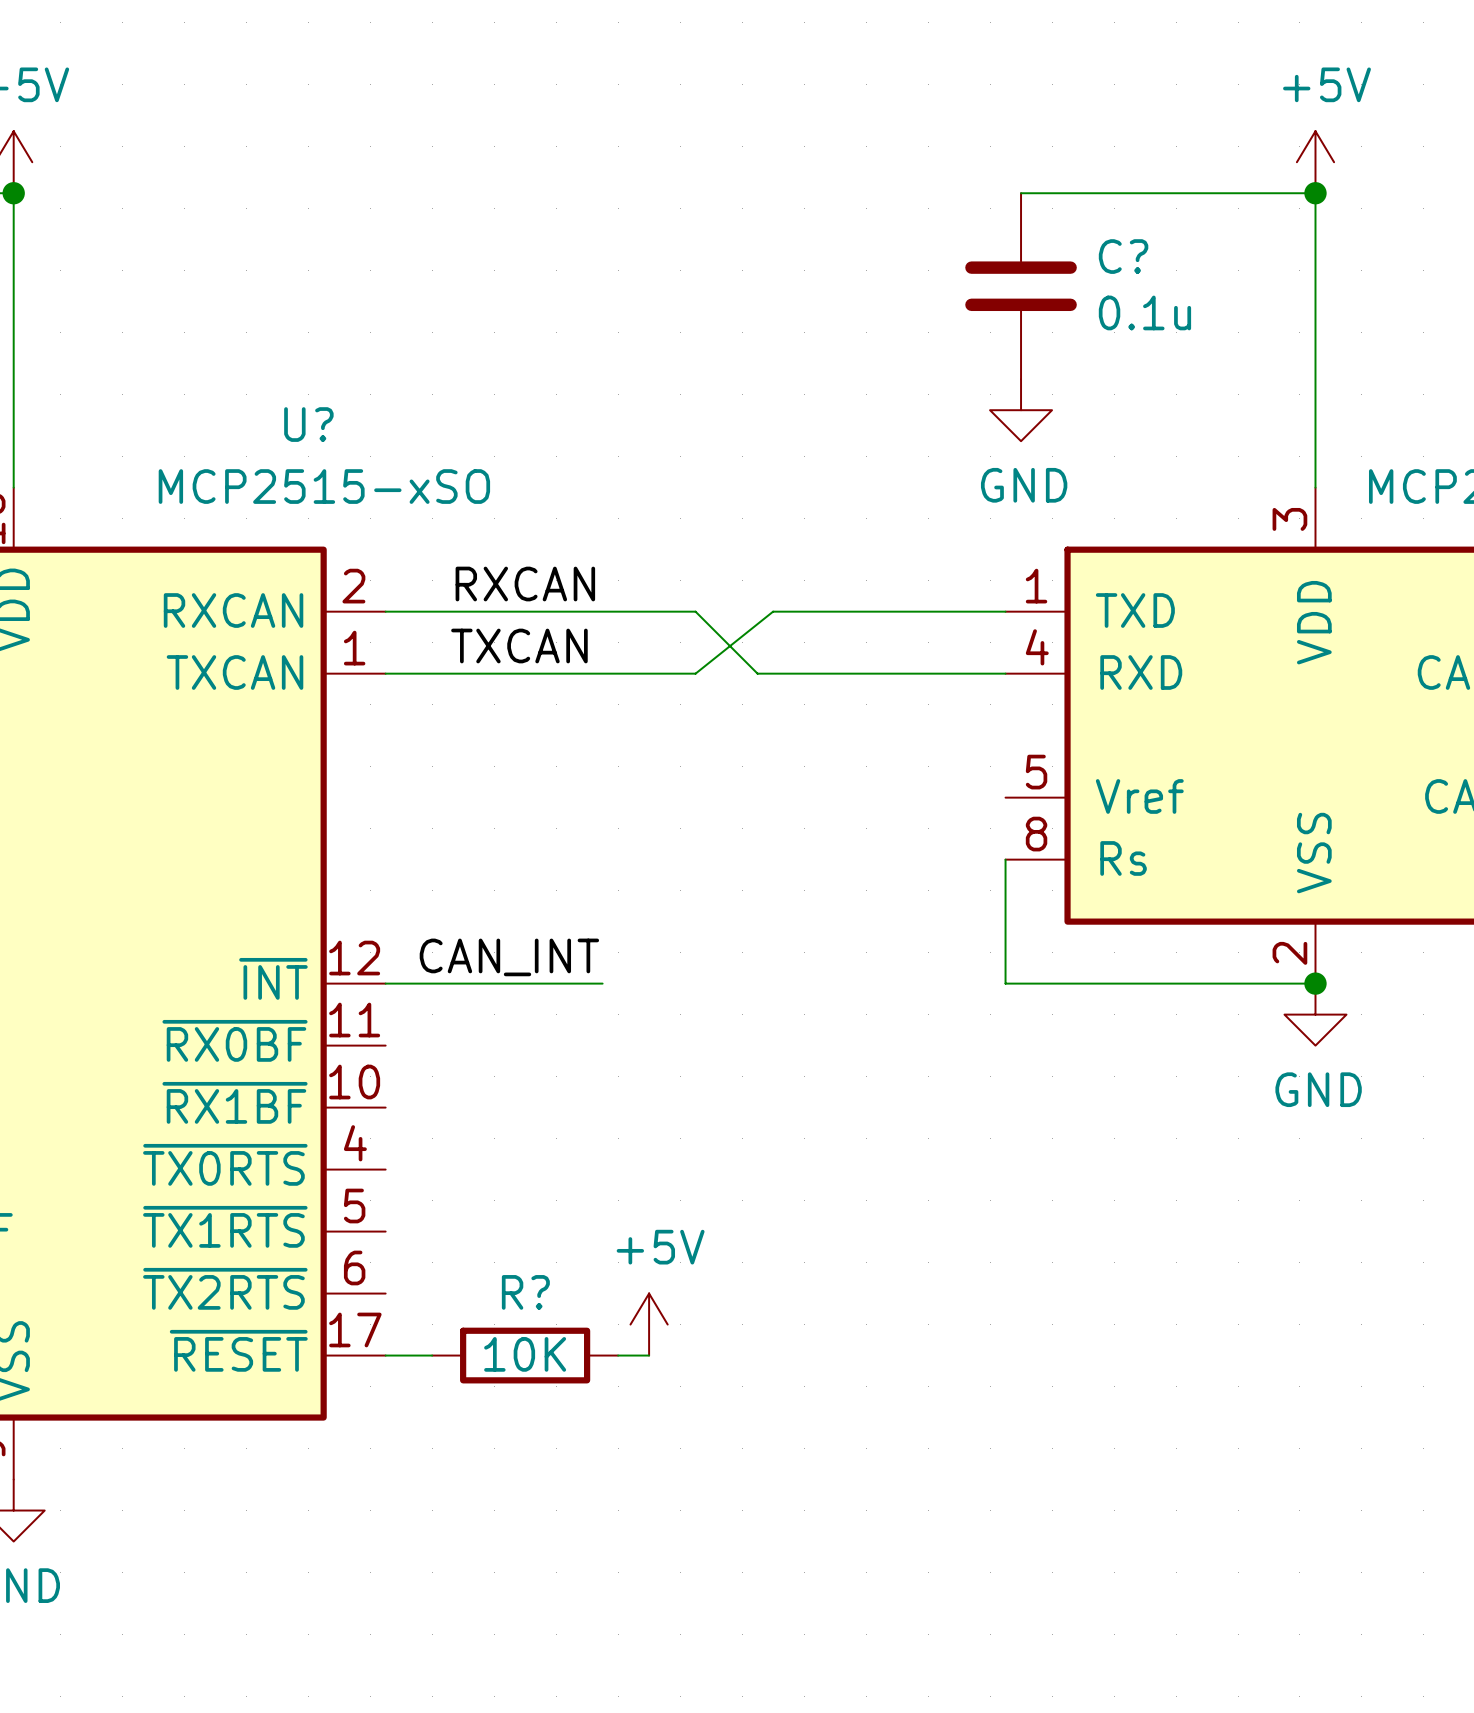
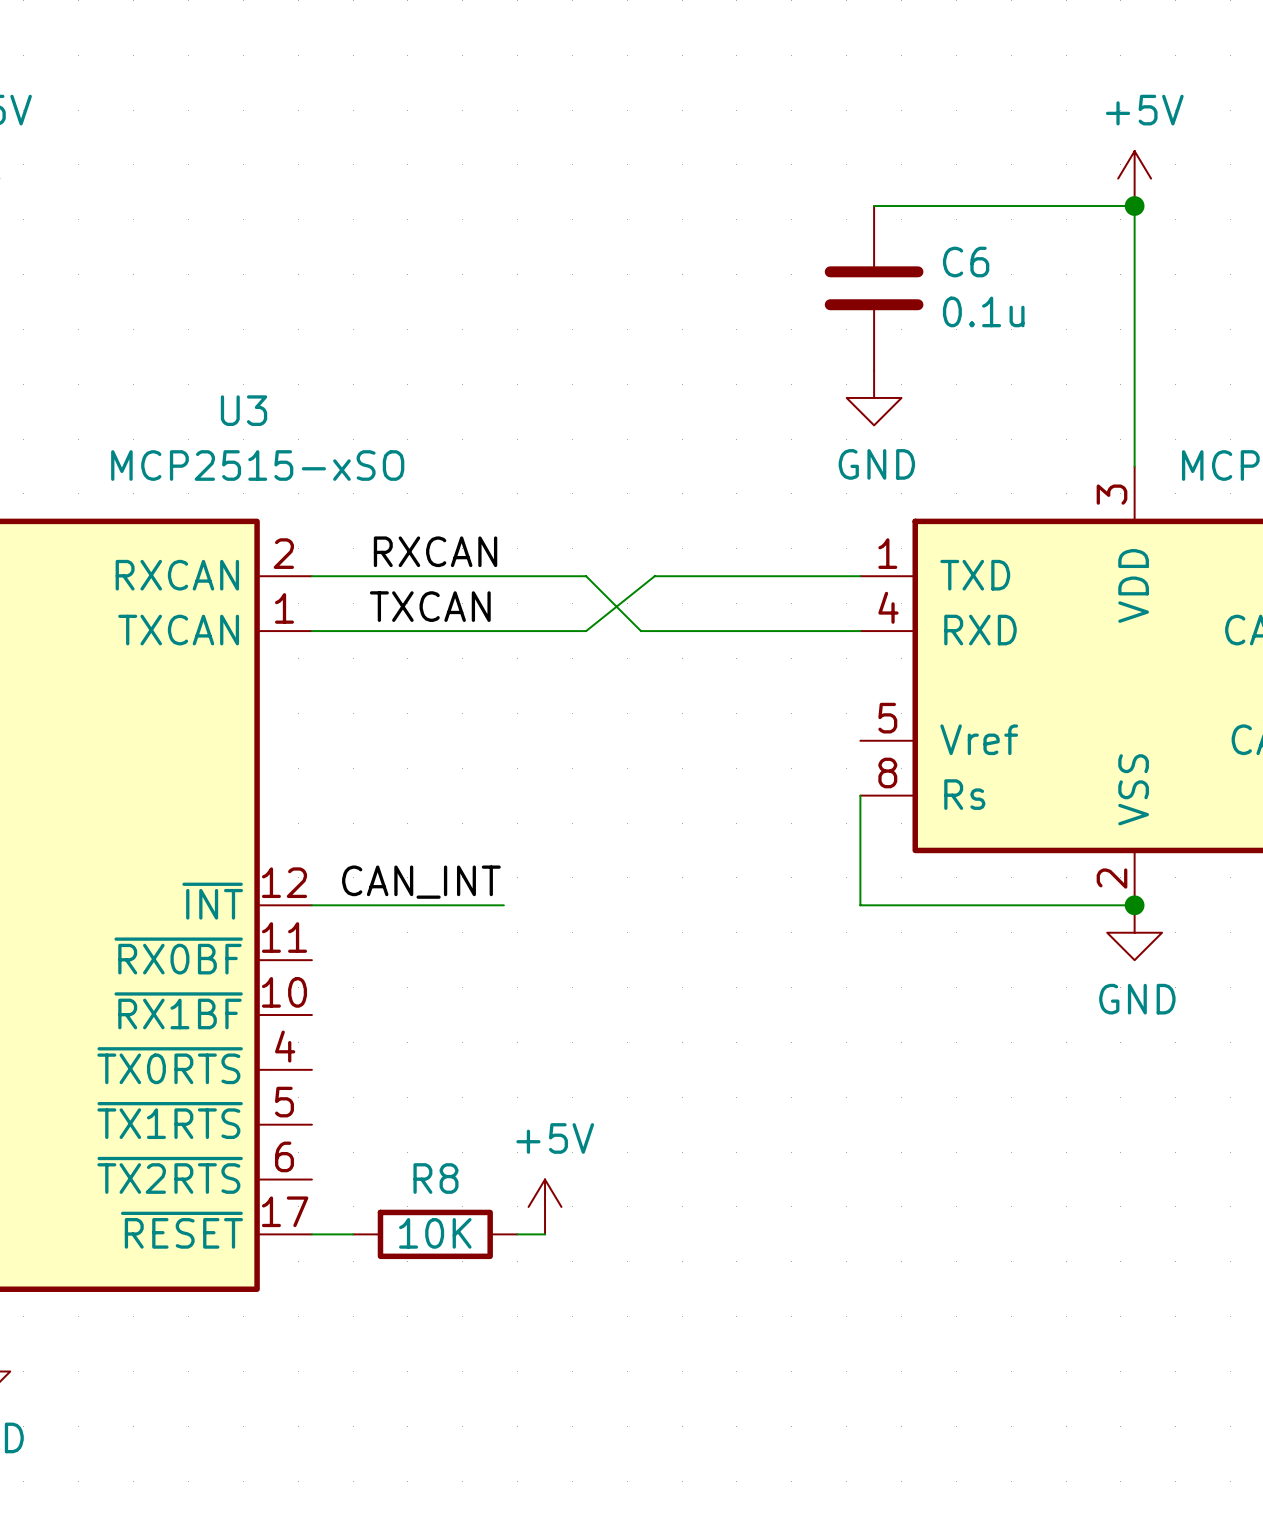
C? name: C? (1123, 256) -> C6 (966, 262)
U? name: U? (308, 424) -> U3 (244, 410)
R? name: R? (525, 1292) -> R8 (435, 1178)

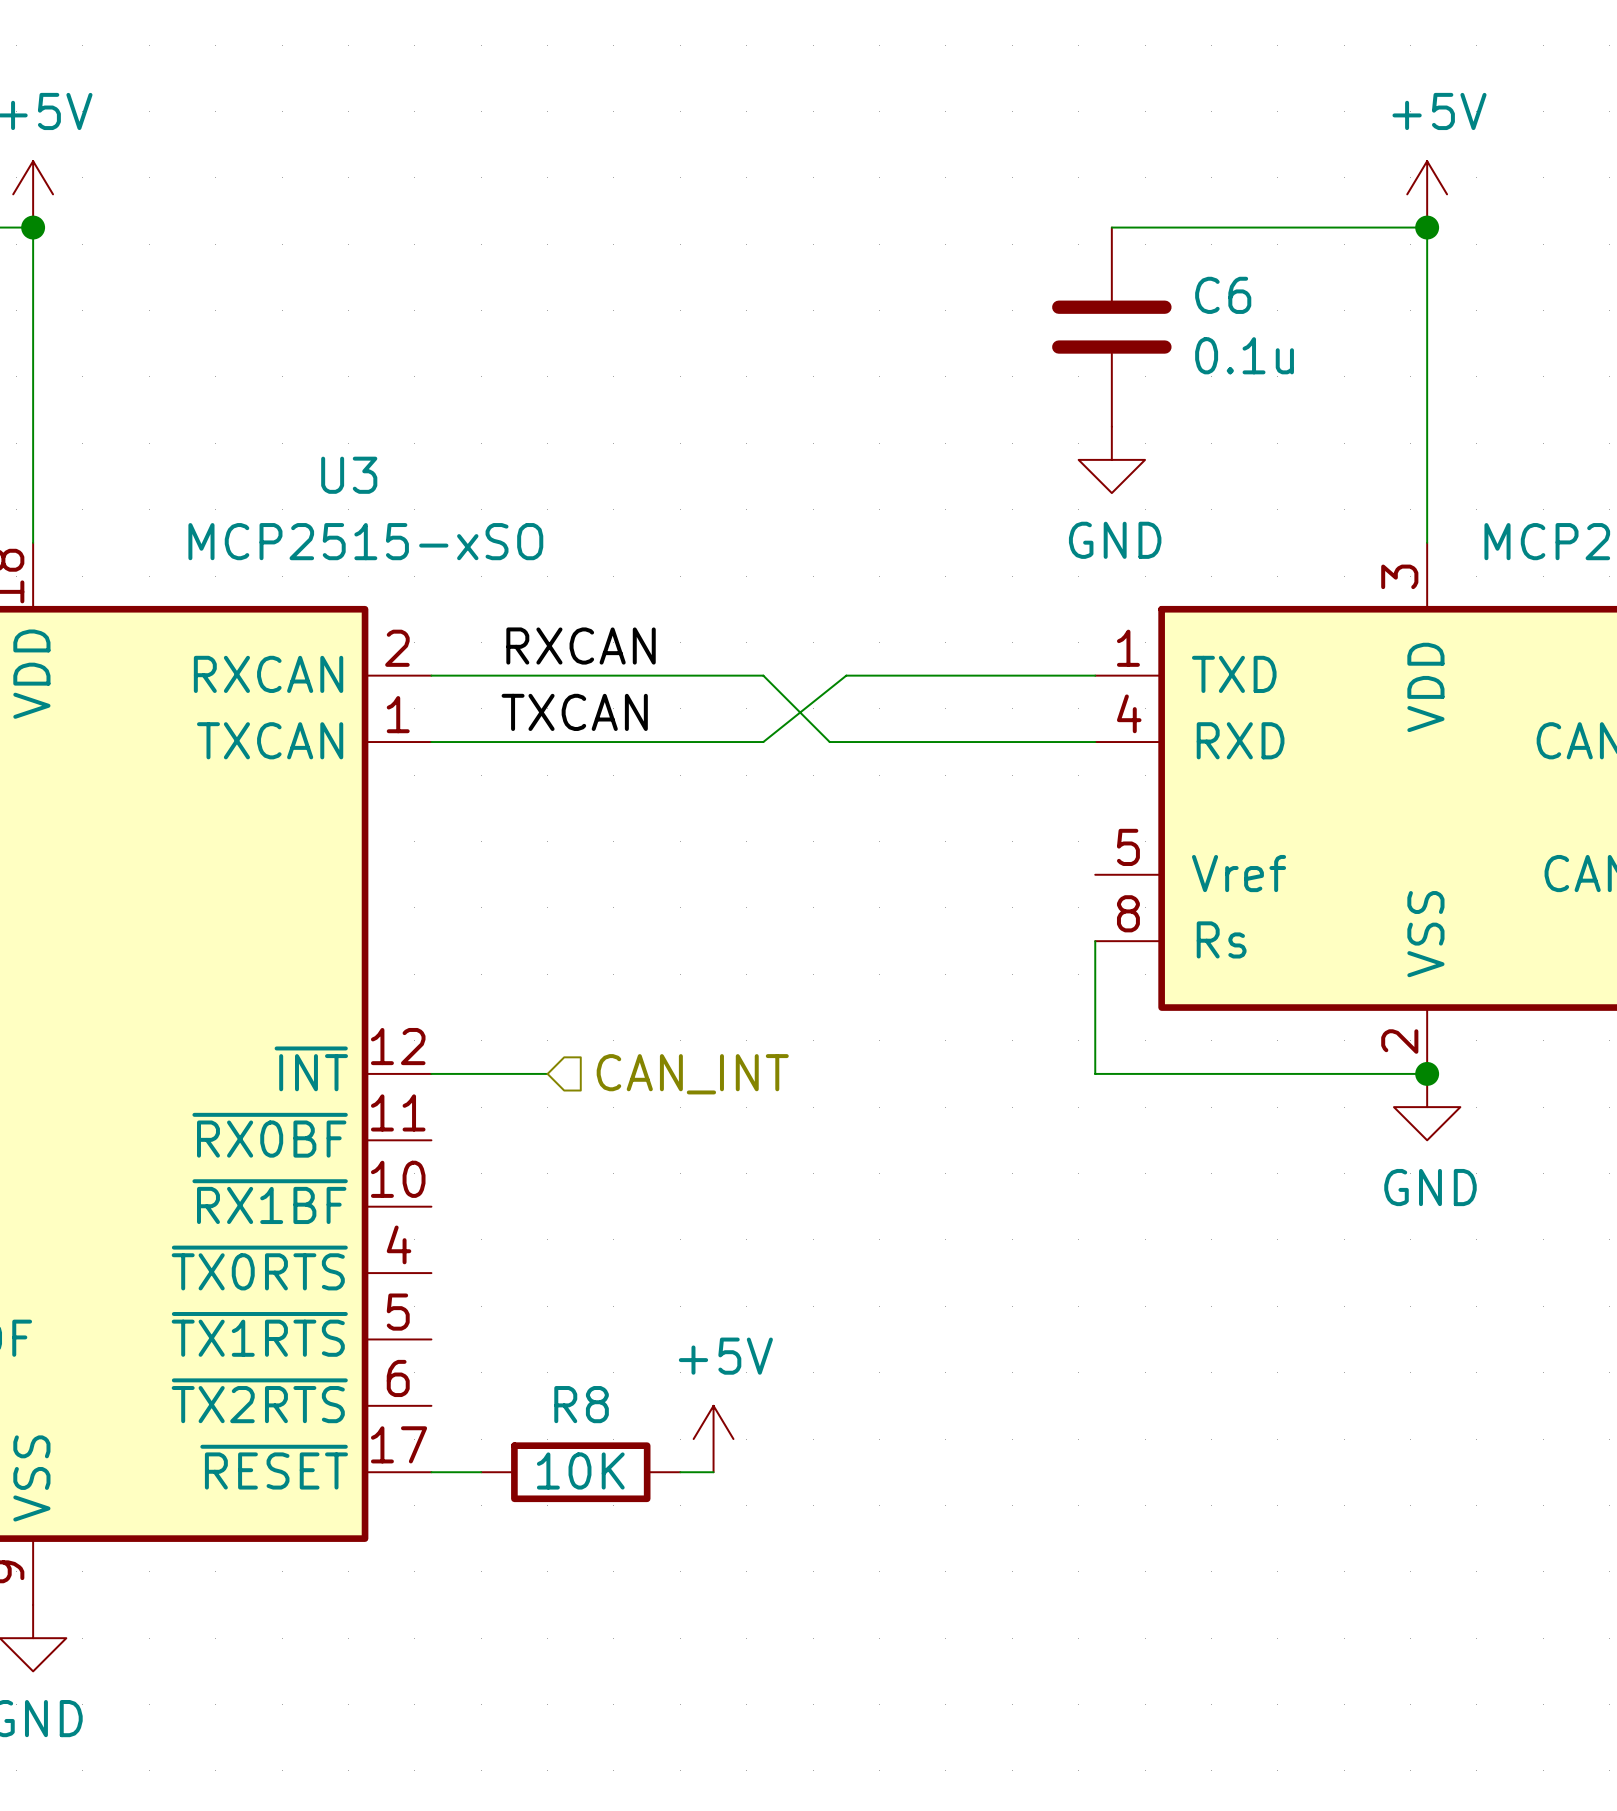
label: CAN_INT (421, 882) -> none
wire: (407, 905) (503, 905) -> none
hierarchical label: none -> CAN_INT (692, 1074)

